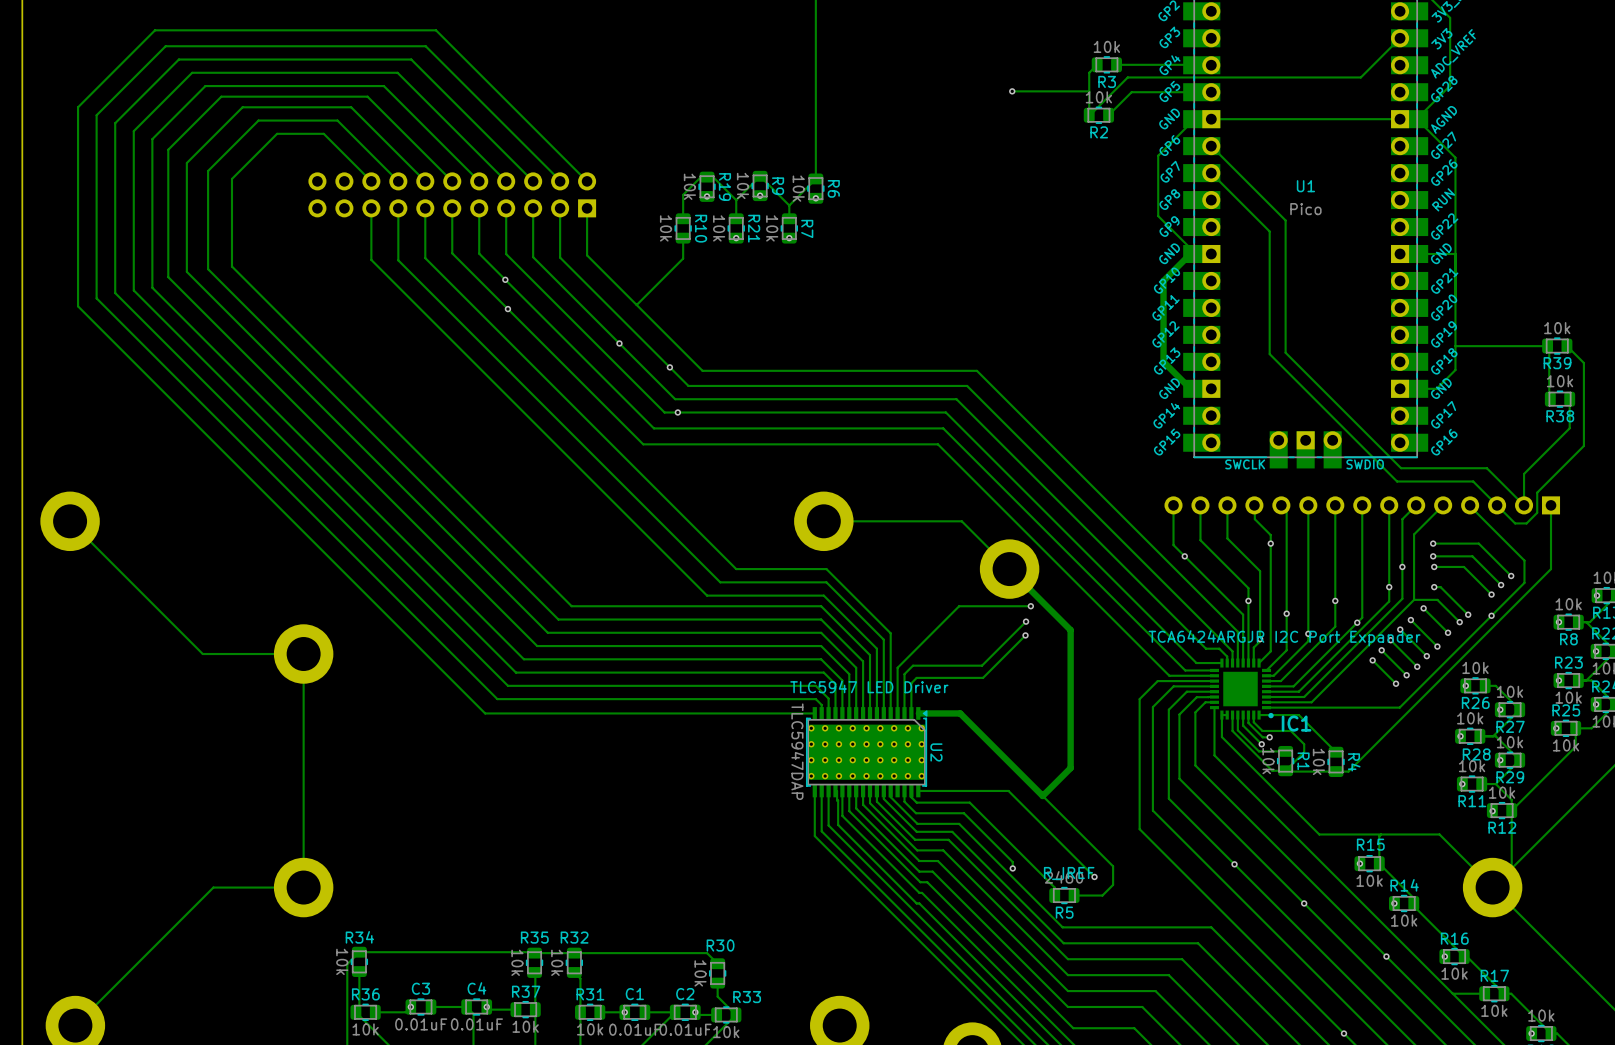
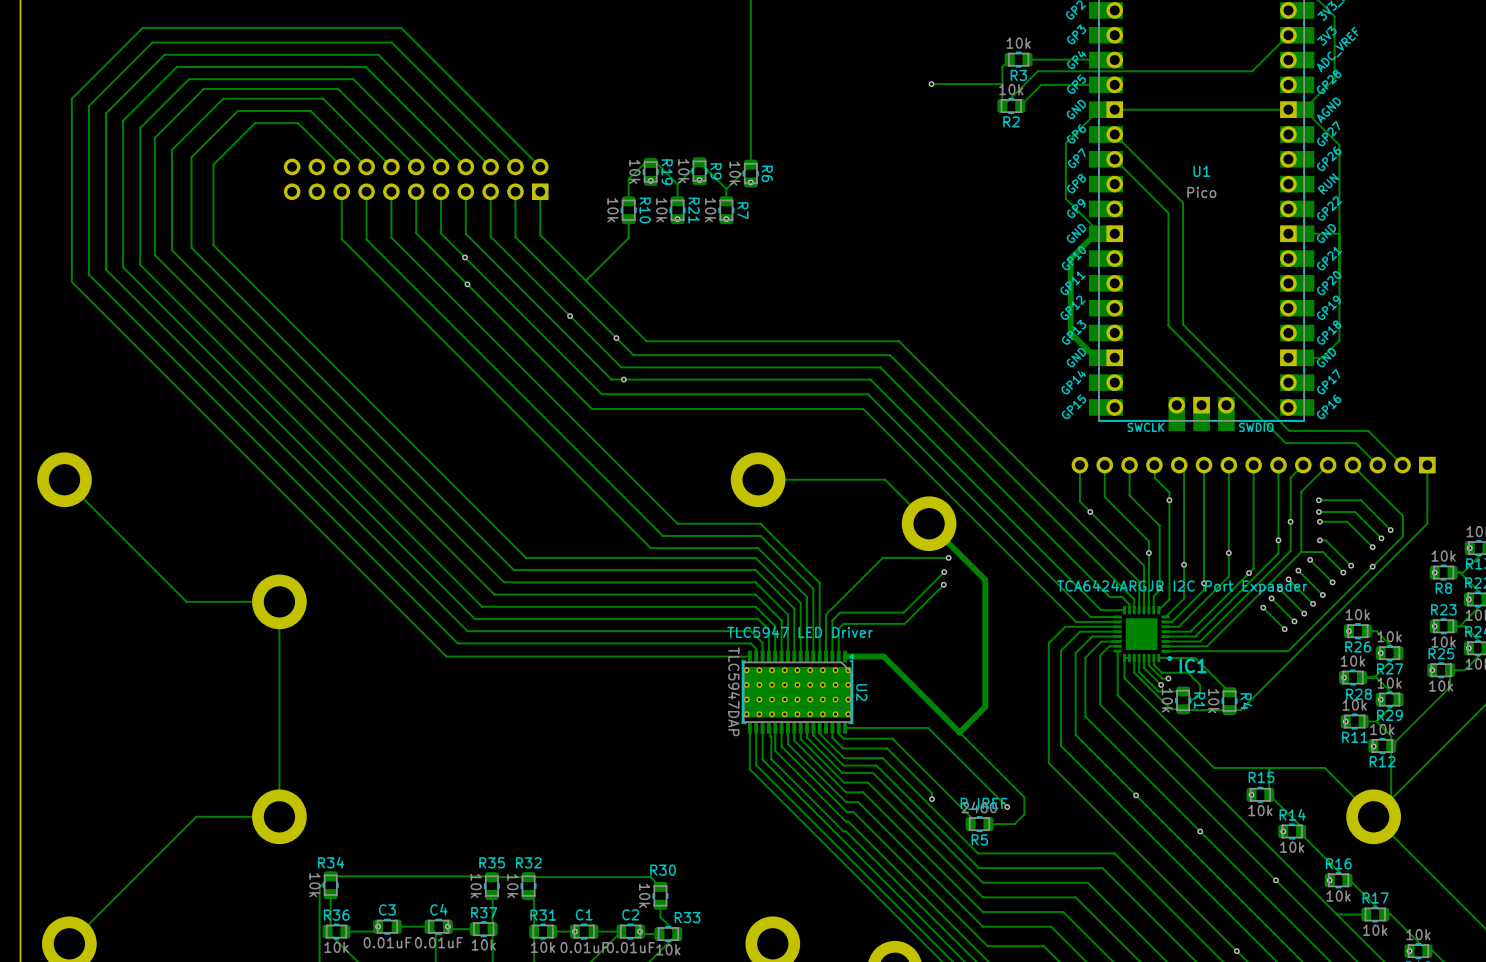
track: (1455, 346) (1548, 346) (1549, 399) -> none
R39: 10k (1557, 346) -> none
track: (1566, 346) (1583, 363) (1583, 445) (1537, 492) (1537, 512) (1526, 523) (1515, 523) (1497, 505) -> none
R38: 10k (1560, 399) -> none
track: (1569, 399) (1569, 428) (1524, 473) (1524, 505) -> none

